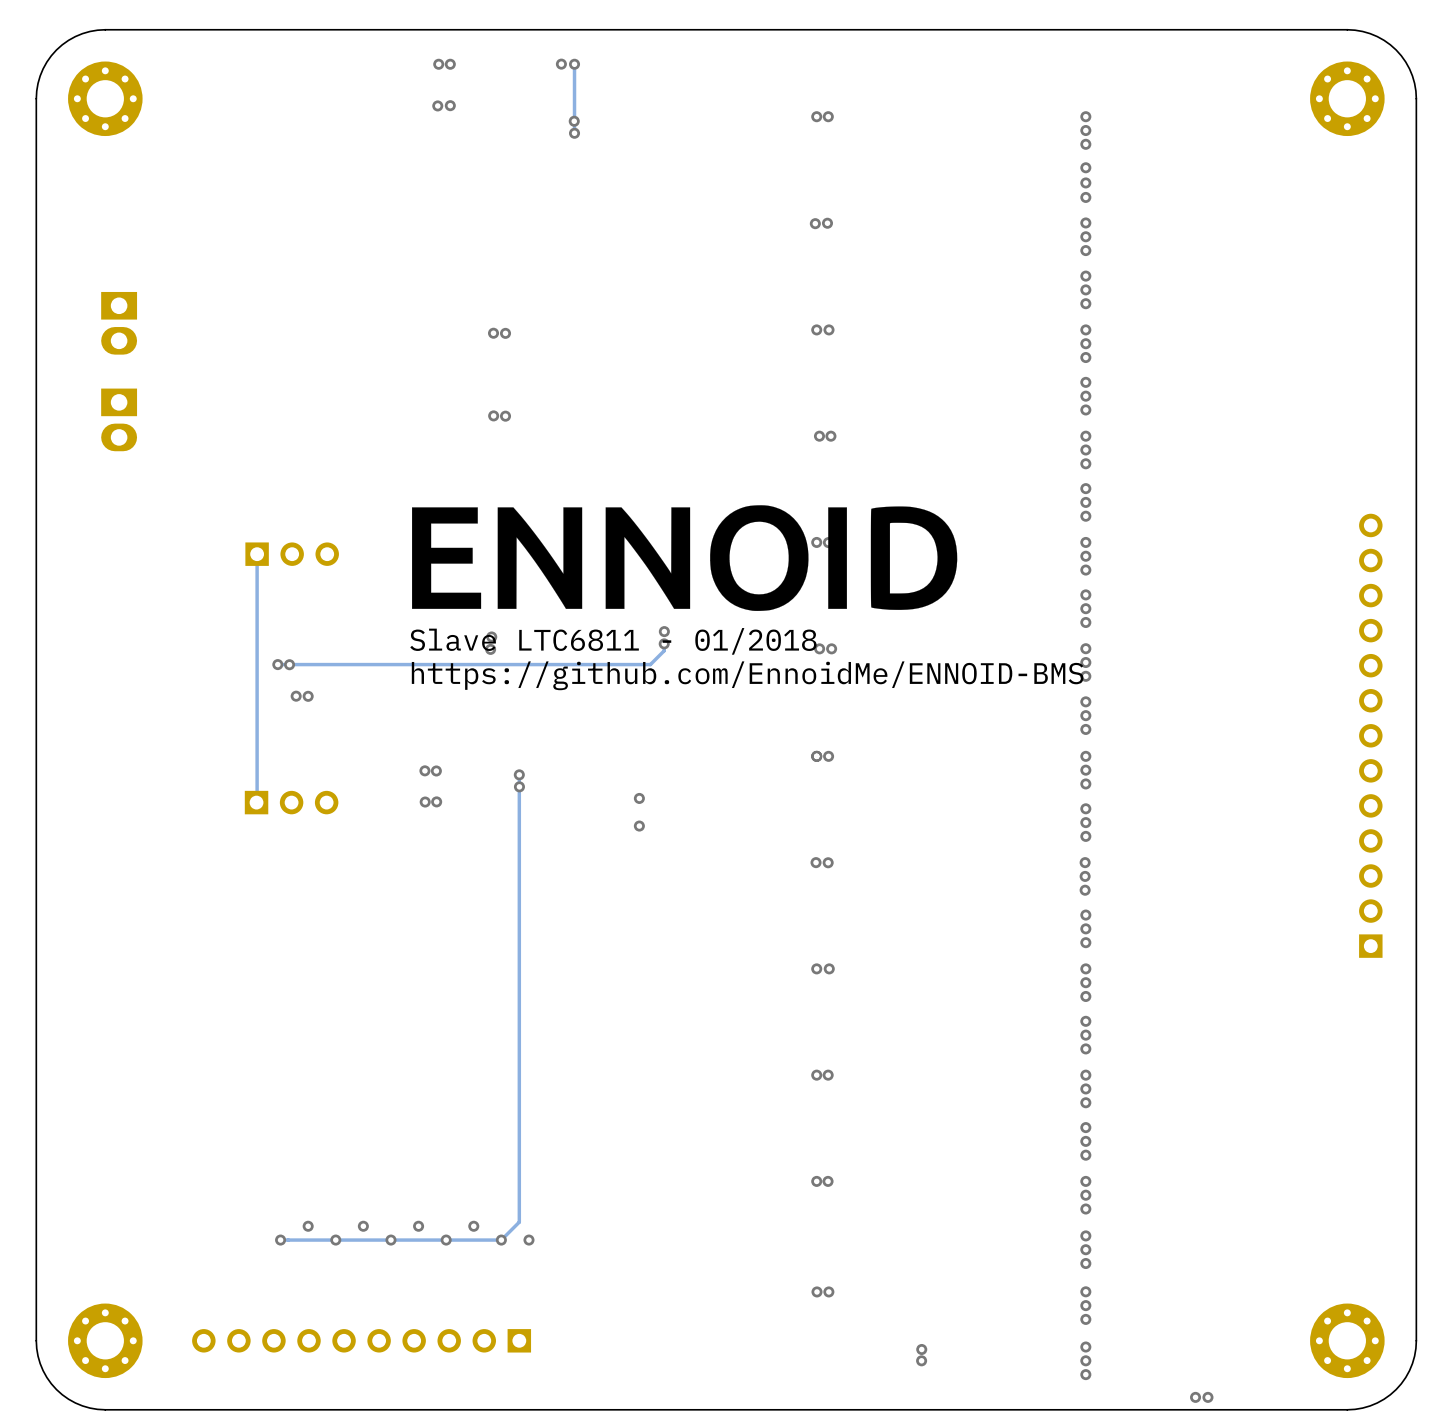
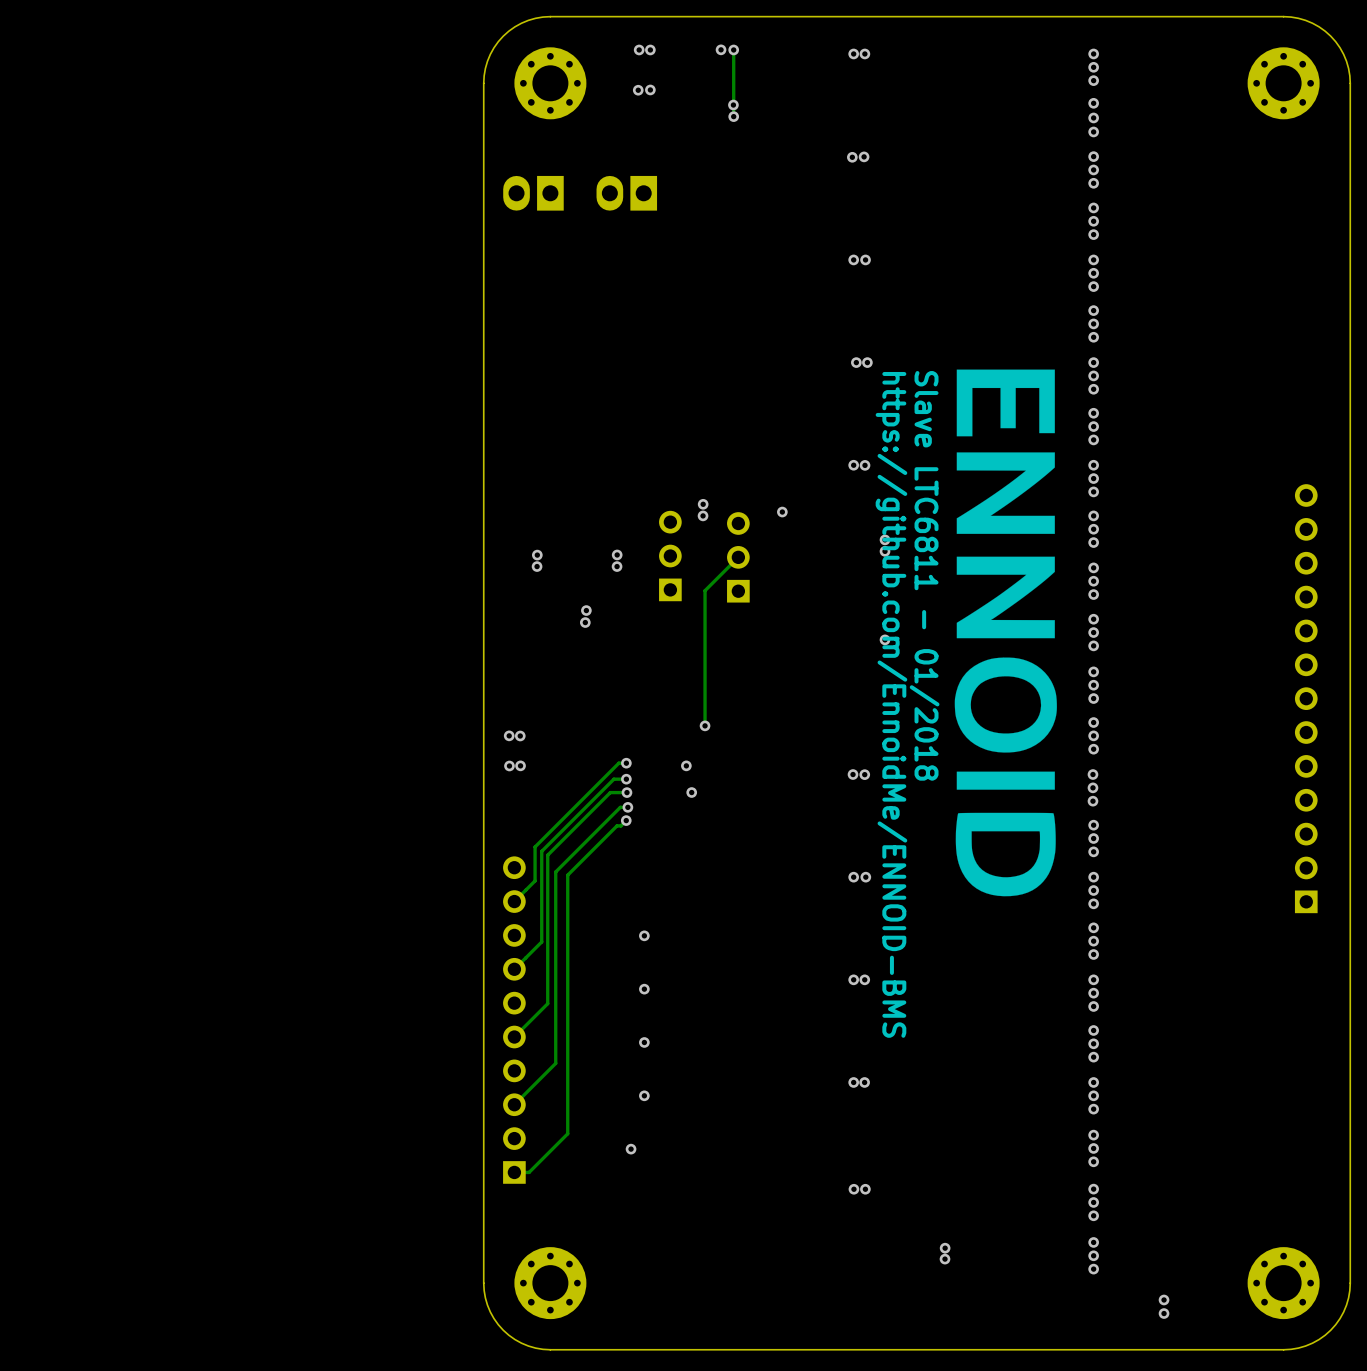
board edge: (588, 29) (97, 30) (75, 36) (56, 49) (46, 62) (40, 75) (36, 98) (36, 1340) (38, 1356) (43, 1370) (56, 1389) (68, 1399) (82, 1405) (97, 1409) (588, 1409) -> (550, 16) (528, 20) (514, 26) (503, 36) (493, 47) (487, 61) (483, 83) (483, 1283) (487, 1305) (493, 1318) (503, 1330) (514, 1339) (528, 1346) (550, 1349)
via: (438, 64) -> none
via: (450, 64) -> none
via: (561, 64) -> none
track: (574, 64) (574, 133) -> (733, 49) (733, 116)
via: (574, 64) -> none
via: none -> (639, 49)
via: none -> (650, 49)
via: none -> (721, 49)
via: none -> (733, 49)
via: none -> (853, 53)
via: none -> (864, 53)
via: none -> (1093, 53)
via: none -> (1093, 67)
via: none -> (1093, 80)
part: (105, 98) -> none
part: none -> (550, 83)
via: (437, 105) -> none
via: (450, 105) -> none
via: none -> (638, 90)
via: none -> (650, 89)
via: (816, 116) -> none
via: (828, 116) -> none
via: (1085, 116) -> none
via: none -> (1093, 103)
via: (574, 121) -> none
via: none -> (733, 105)
via: (1085, 130) -> none
via: (574, 133) -> none
via: none -> (733, 116)
via: none -> (1093, 117)
via: (1085, 144) -> none
via: none -> (1093, 131)
via: (1085, 167) -> none
via: none -> (864, 156)
via: none -> (1093, 156)
via: none -> (852, 157)
via: (1085, 182) -> none
via: none -> (1093, 169)
via: (1085, 197) -> none
via: none -> (1093, 183)
part: none -> (533, 193)
part: none -> (626, 193)
via: (1085, 222) -> none
via: (815, 223) -> none
via: (827, 223) -> none
via: none -> (1093, 207)
via: (1085, 236) -> none
via: none -> (1093, 221)
via: (1085, 250) -> none
via: none -> (1093, 234)
via: (1085, 276) -> none
via: none -> (853, 259)
via: none -> (865, 259)
via: none -> (1093, 259)
via: (1085, 289) -> none
via: none -> (1093, 273)
via: (1085, 303) -> none
via: none -> (1093, 286)
part: (119, 323) -> none
via: (816, 329) -> none
via: (829, 329) -> none
via: (1085, 329) -> none
via: (493, 333) -> none
via: (505, 333) -> none
via: none -> (1093, 310)
via: (1085, 343) -> none
via: none -> (1093, 323)
via: (1085, 357) -> none
via: none -> (1093, 337)
via: (1085, 382) -> none
via: none -> (856, 362)
via: none -> (867, 362)
via: none -> (1093, 362)
drawing: none -> [954, 369, 1057, 897]
via: (1085, 396) -> none
via: none -> (1093, 375)
via: (1085, 409) -> none
via: (493, 415) -> none
via: none -> (1093, 389)
via: (505, 416) -> none
part: (119, 419) -> none
via: (819, 436) -> none
via: (830, 436) -> none
via: (1085, 436) -> none
via: none -> (1093, 413)
via: (1085, 449) -> none
via: none -> (1093, 426)
via: (1085, 463) -> none
via: none -> (1093, 439)
via: (1085, 488) -> none
via: none -> (853, 465)
via: none -> (865, 465)
via: none -> (1093, 465)
via: (1085, 502) -> none
drawing: [412, 505, 958, 611] -> none
via: none -> (1093, 478)
via: (1085, 516) -> none
via: none -> (1093, 491)
via: none -> (703, 504)
via: (816, 542) -> none
via: (1085, 542) -> none
via: none -> (703, 515)
via: none -> (1093, 515)
track: (257, 554) (256, 802) -> none
part: (292, 554) -> none
via: (1085, 556) -> none
via: none -> (1093, 529)
via: (1085, 570) -> none
via: none -> (885, 539)
via: none -> (1093, 542)
via: none -> (885, 551)
via: none -> (537, 555)
via: none -> (617, 554)
part: none -> (670, 556)
track: none -> (738, 557) (705, 590) (705, 725)
part: none -> (738, 557)
via: (1085, 594) -> none
text: none -> Slave LTC6811 - 01/2018 (924, 575)
via: none -> (537, 566)
via: none -> (617, 566)
via: none -> (1093, 567)
via: (1085, 608) -> none
via: none -> (1093, 581)
via: (1085, 622) -> none
via: none -> (1093, 594)
via: (664, 631) -> none
via: (491, 636) -> none
text: Slave LTC6811 - 01/2018 (613, 641) -> none
track: (664, 643) (664, 650) (650, 664) (277, 664) -> none
via: (664, 643) -> none
via: none -> (586, 610)
via: (819, 648) -> none
via: (831, 648) -> none
via: (1085, 648) -> none
via: (490, 649) -> none
via: none -> (1093, 619)
via: none -> (585, 622)
via: (1085, 662) -> none
via: (277, 664) -> none
via: (289, 664) -> none
via: none -> (1093, 632)
via: none -> (885, 639)
text: https://github.com/EnnoidMe/ENNOID-BMS (747, 675) -> none
via: (1085, 676) -> none
via: none -> (1093, 645)
via: (296, 696) -> none
via: (308, 696) -> none
via: (1085, 701) -> none
via: none -> (1093, 671)
via: (1085, 715) -> none
via: none -> (1093, 685)
via: (1085, 729) -> none
text: none -> https://github.com/EnnoidMe/ENNOID-BMS (891, 704)
via: none -> (1093, 698)
via: (816, 756) -> none
via: (828, 756) -> none
via: (1085, 756) -> none
via: none -> (1093, 722)
via: none -> (705, 725)
via: (424, 770) -> none
via: (436, 770) -> none
via: (1085, 770) -> none
track: (519, 774) (519, 1222) (501, 1240) (280, 1240) -> none
via: (519, 774) -> none
via: none -> (509, 735)
via: none -> (520, 735)
via: none -> (1093, 735)
via: (1085, 783) -> none
via: (519, 786) -> none
via: none -> (1093, 749)
via: (639, 798) -> none
via: (436, 801) -> none
part: (291, 802) -> none
via: (425, 802) -> none
track: none -> (626, 763) (618, 763) (535, 846) (535, 880) (514, 901)
via: none -> (626, 763)
via: none -> (509, 765)
via: none -> (520, 765)
via: none -> (686, 765)
via: (1085, 808) -> none
via: none -> (853, 774)
via: none -> (864, 774)
via: none -> (1092, 774)
track: none -> (626, 779) (613, 779) (541, 851) (541, 941) (514, 969)
via: none -> (626, 779)
via: (1085, 822) -> none
via: (639, 826) -> none
via: none -> (1092, 787)
via: none -> (691, 792)
track: none -> (626, 792) (610, 792) (547, 855) (547, 1003) (514, 1037)
via: none -> (626, 792)
via: (1085, 836) -> none
via: none -> (1092, 801)
track: none -> (627, 807) (620, 807) (555, 871) (555, 1063) (514, 1104)
via: none -> (627, 807)
track: none -> (626, 820) (620, 825) (616, 825) (567, 875) (567, 1133) (529, 1172) (514, 1172)
via: none -> (626, 820)
via: (816, 862) -> none
via: (828, 862) -> none
via: (1085, 862) -> none
via: none -> (1093, 825)
via: (1085, 876) -> none
via: none -> (1093, 838)
via: (1085, 890) -> none
via: none -> (1093, 851)
via: (1085, 915) -> none
via: none -> (853, 877)
via: none -> (865, 877)
via: none -> (1093, 877)
via: (1085, 928) -> none
via: none -> (1093, 890)
via: (1085, 942) -> none
via: none -> (1093, 903)
via: (816, 968) -> none
via: (829, 968) -> none
via: (1085, 968) -> none
via: none -> (1093, 927)
via: none -> (644, 935)
via: (1085, 982) -> none
via: none -> (1093, 941)
via: (1085, 996) -> none
via: none -> (1093, 954)
via: (1085, 1021) -> none
via: none -> (853, 979)
via: none -> (864, 979)
via: none -> (1093, 979)
via: (1085, 1035) -> none
via: none -> (644, 989)
via: none -> (1093, 993)
via: (1085, 1048) -> none
via: none -> (1093, 1006)
via: (816, 1075) -> none
via: (828, 1075) -> none
via: (1085, 1075) -> none
via: none -> (1093, 1030)
via: (1085, 1088) -> none
via: none -> (644, 1042)
via: none -> (1093, 1043)
via: (1085, 1102) -> none
via: none -> (1093, 1057)
via: (1085, 1127) -> none
via: none -> (853, 1082)
via: none -> (864, 1082)
via: none -> (1093, 1082)
via: (1085, 1141) -> none
via: none -> (644, 1095)
via: none -> (1093, 1095)
via: (1085, 1155) -> none
via: none -> (1093, 1109)
via: (816, 1181) -> none
via: (828, 1181) -> none
via: (1085, 1181) -> none
via: none -> (1093, 1135)
via: (1085, 1195) -> none
via: none -> (1093, 1148)
via: none -> (631, 1149)
via: (1085, 1209) -> none
via: none -> (1093, 1161)
via: (308, 1226) -> none
via: (363, 1226) -> none
via: (418, 1226) -> none
via: (473, 1226) -> none
via: (1085, 1235) -> none
via: (280, 1240) -> none
via: (335, 1240) -> none
via: (390, 1240) -> none
via: (446, 1240) -> none
via: (501, 1240) -> none
via: (528, 1240) -> none
via: none -> (853, 1189)
via: none -> (865, 1189)
via: none -> (1093, 1189)
via: (1085, 1249) -> none
via: none -> (1093, 1202)
via: (1085, 1263) -> none
via: none -> (1093, 1215)
via: (816, 1291) -> none
via: (828, 1291) -> none
via: (1085, 1291) -> none
via: none -> (1093, 1242)
via: none -> (945, 1248)
via: (1085, 1305) -> none
via: none -> (1093, 1255)
via: none -> (945, 1259)
via: (1085, 1319) -> none
via: none -> (1093, 1269)
part: (105, 1340) -> none
part rotation: 0° (361, 1340) -> 90° clockwise (514, 1020)
part position: (361, 1340) -> (514, 1020)
part: none -> (550, 1283)
via: (1085, 1347) -> none
via: (921, 1349) -> none
via: none -> (1164, 1299)
via: (921, 1360) -> none
via: (1085, 1360) -> none
via: none -> (1164, 1313)
via: (1085, 1374) -> none
via: (1195, 1397) -> none
via: (1207, 1397) -> none

